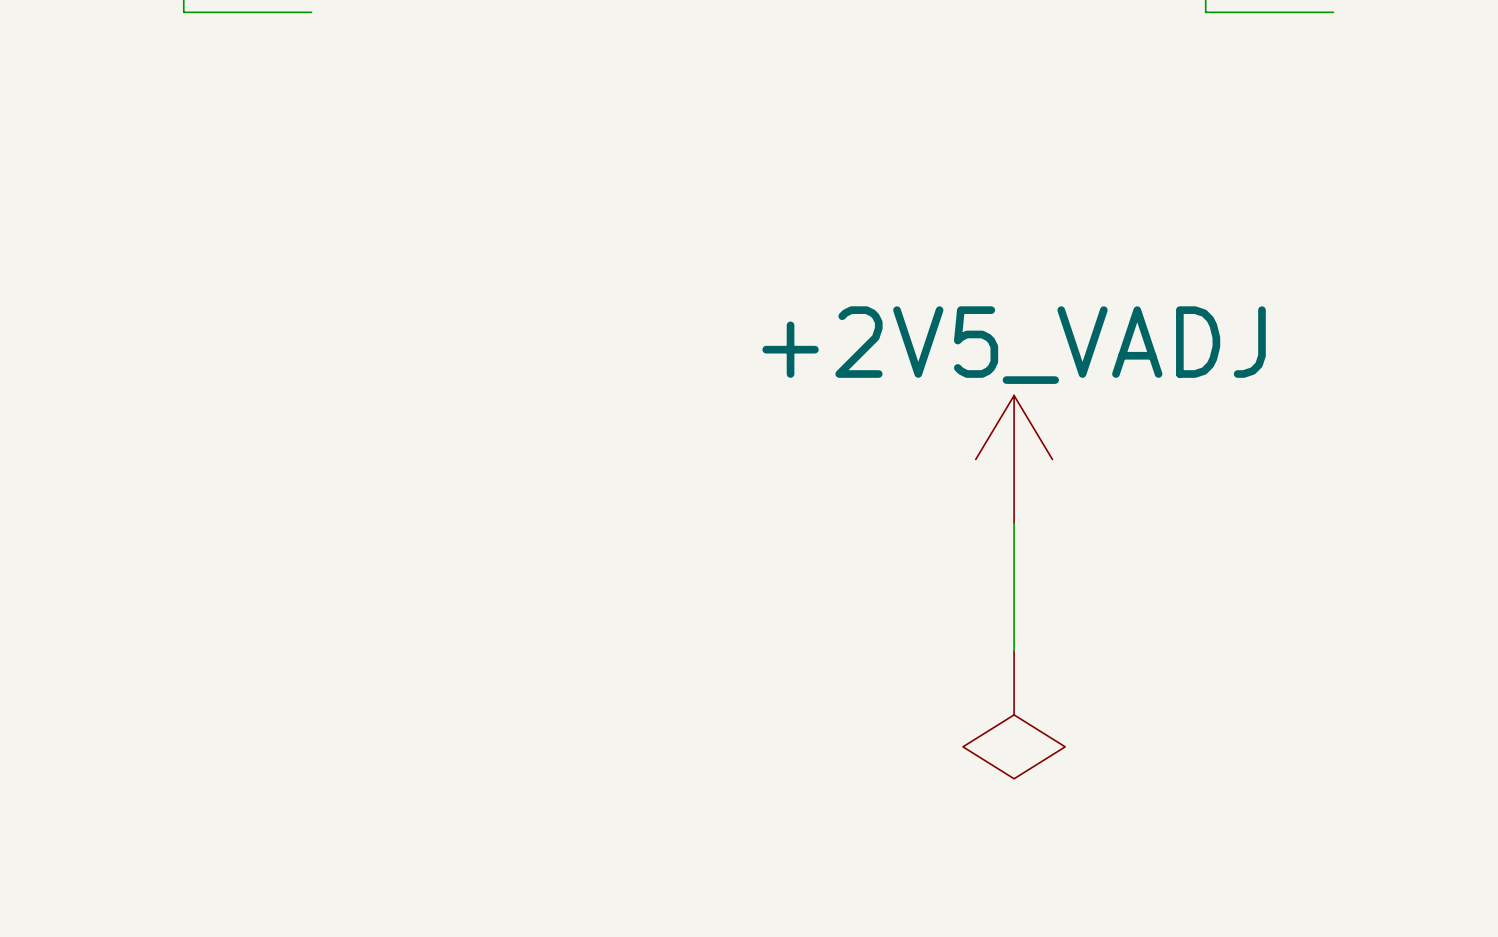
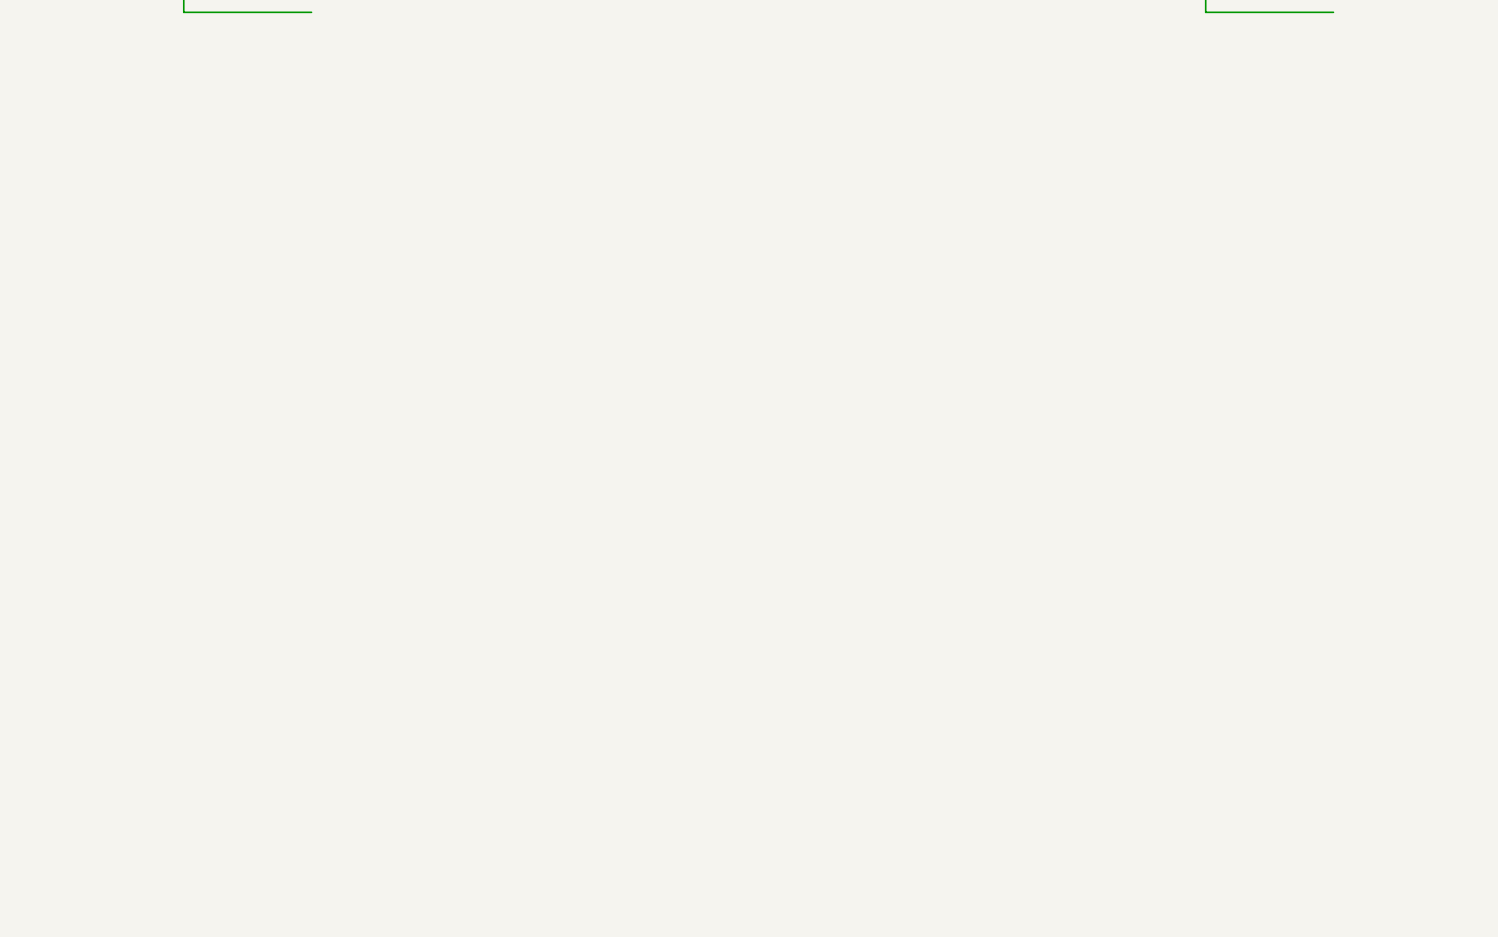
power symbol: +2V5_VADJ (1014, 459) -> none
wire: (1014, 523) (1014, 651) -> none
power symbol: (1014, 714) -> none

